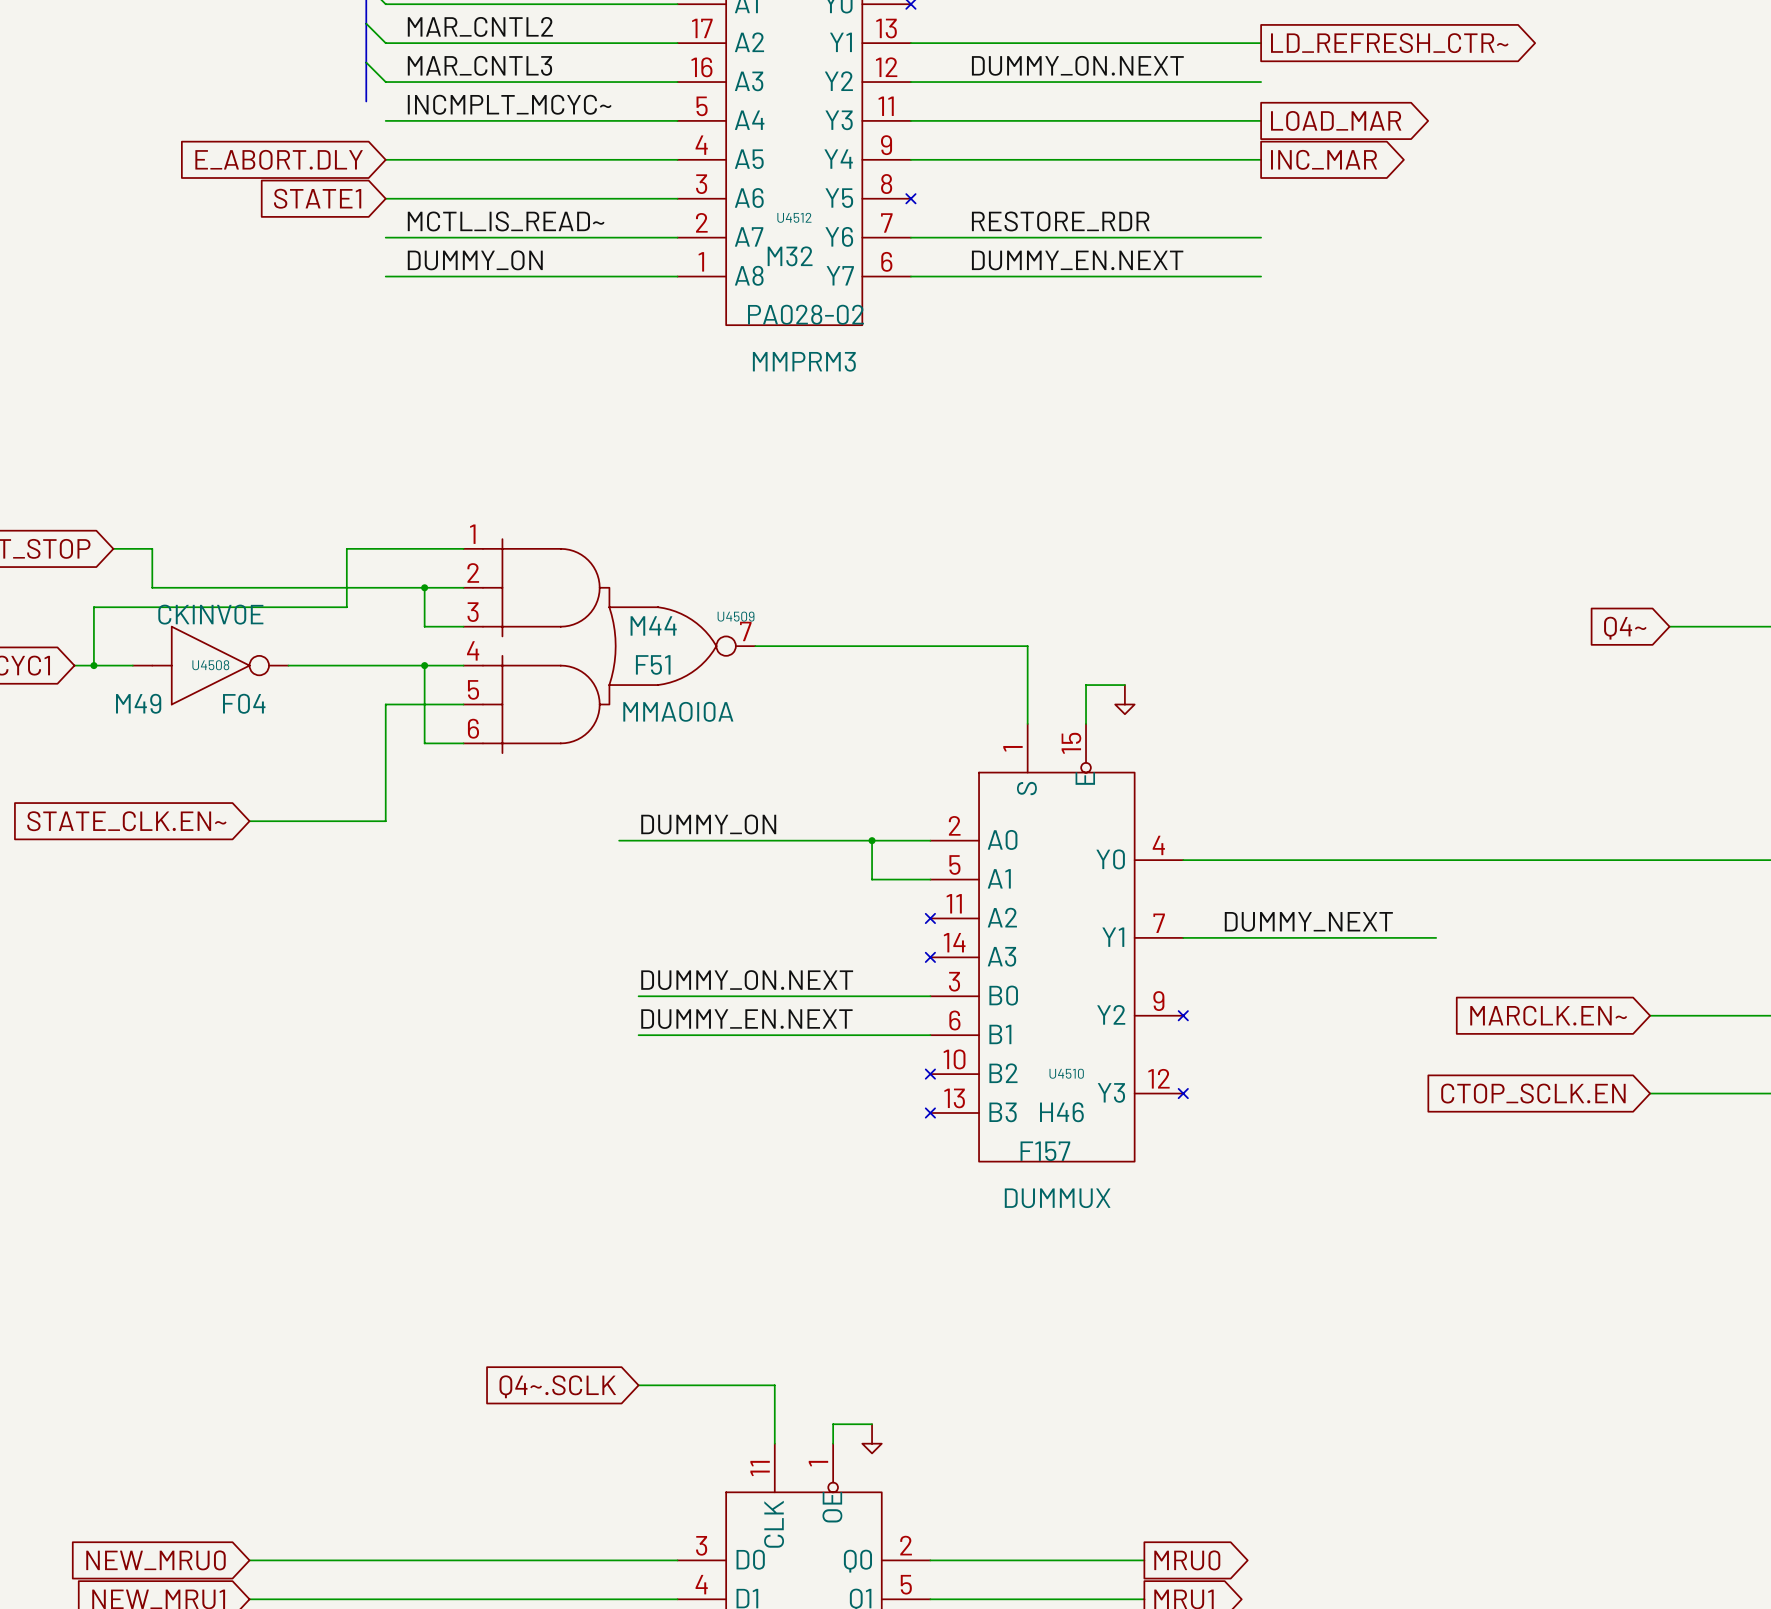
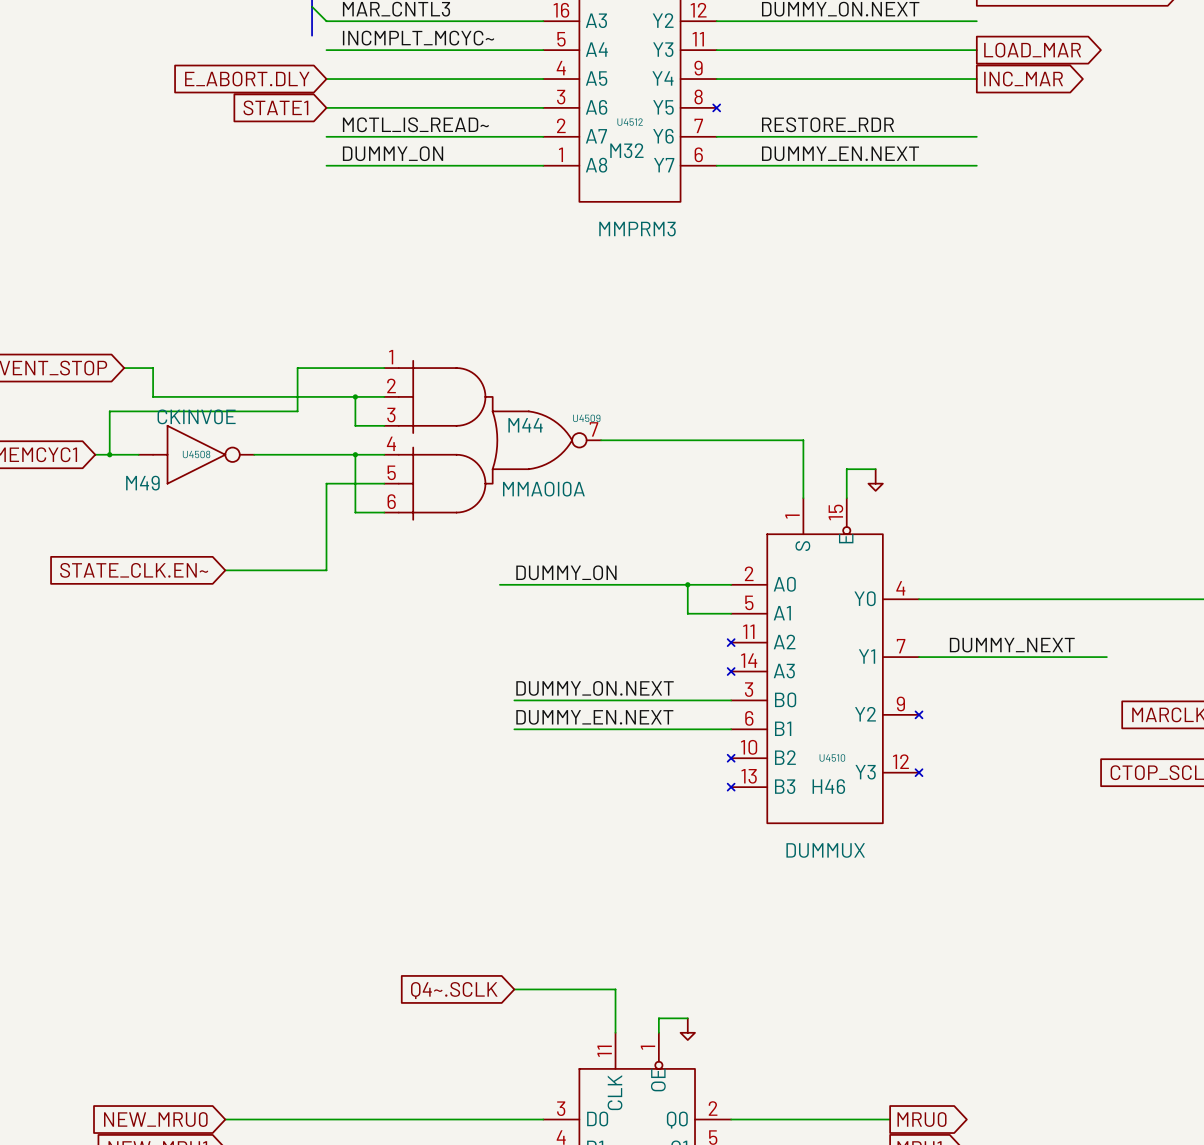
U4512 value: PA028-02 (805, 314) -> none
U4509 value: F51 (653, 664) -> none
U4508 value: F04 (244, 703) -> none
U4510 value: F157 (1045, 1151) -> none

